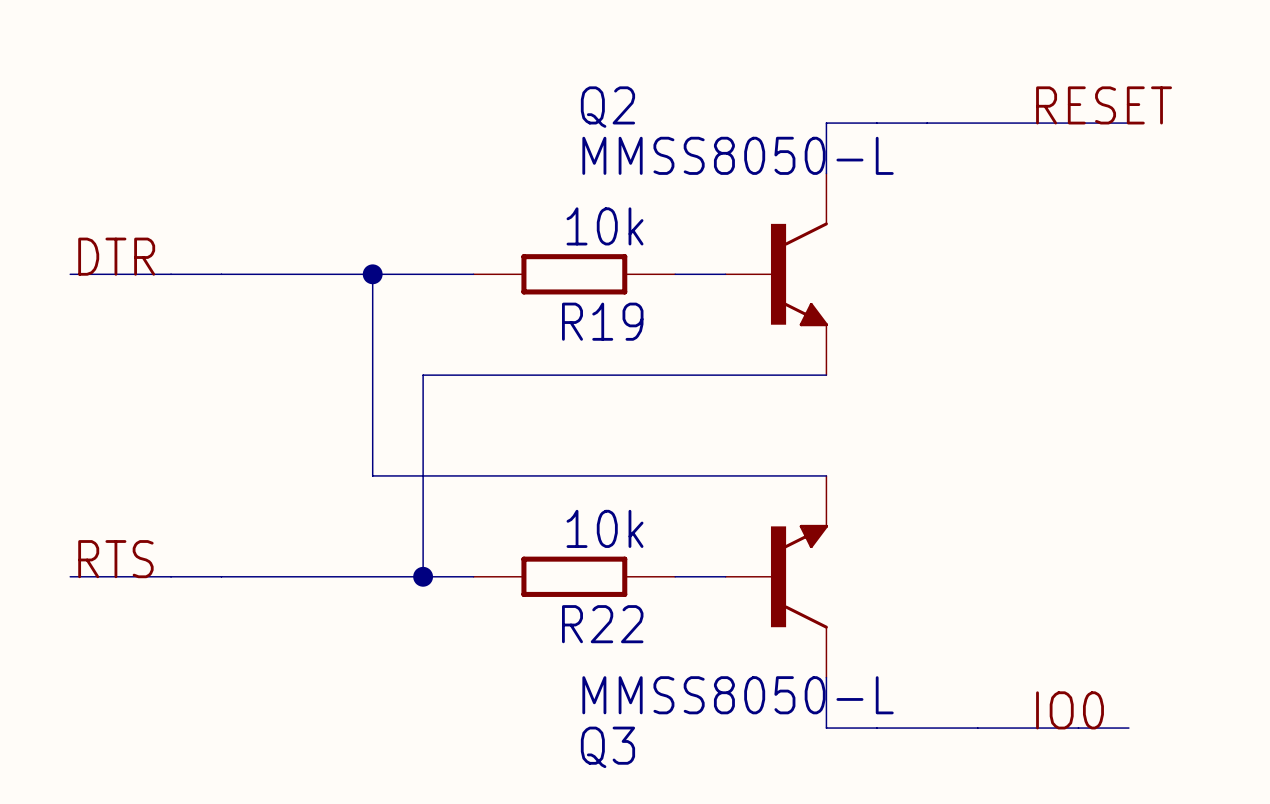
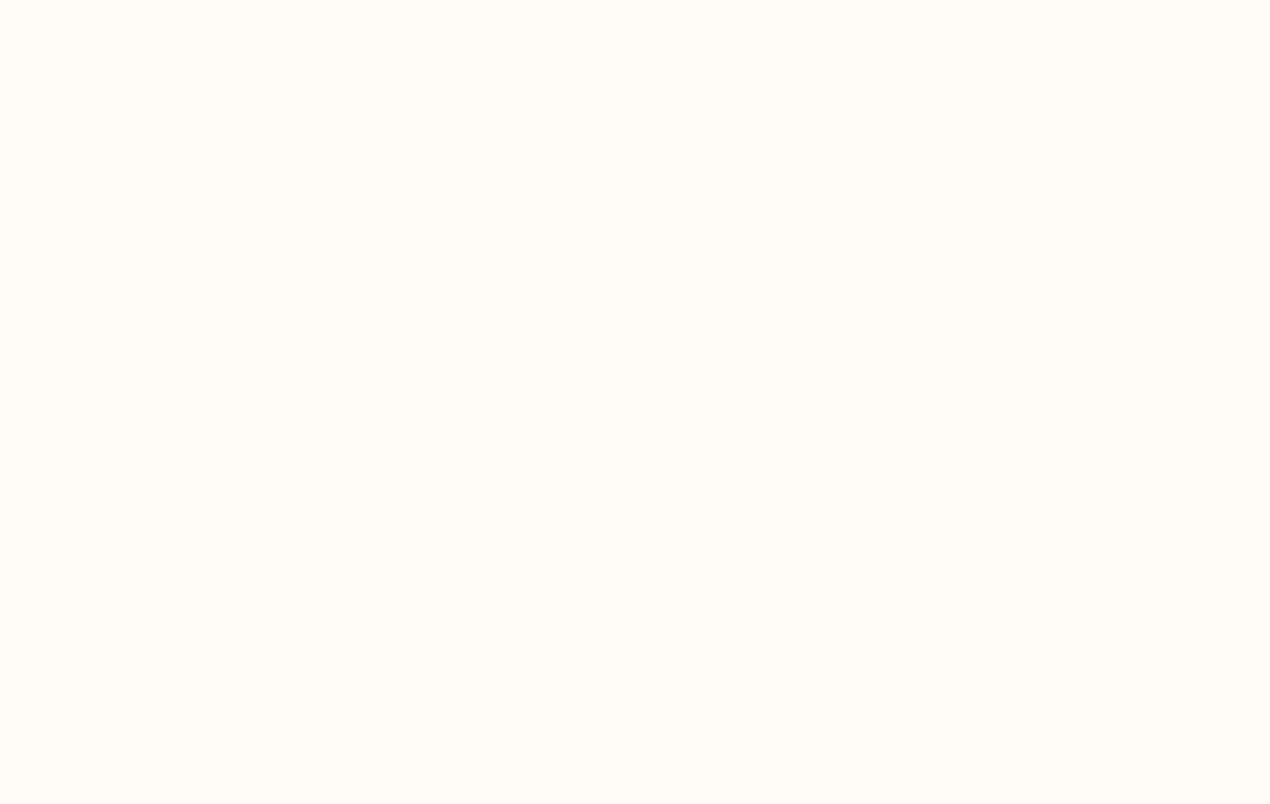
label: RESET (1104, 105) -> none
wire: (1128, 123) (826, 123) (826, 173) -> none
label: DTR (116, 256) -> none
wire: (70, 274) (473, 274) -> none
wire: (372, 274) (372, 475) (826, 475) -> none
junction: (372, 274) -> none
R19: 10k (574, 274) -> none
wire: (675, 274) (725, 274) -> none
Q2: MMSS8050-L (776, 274) -> none
wire: (826, 375) (423, 375) (423, 576) -> none
label: RTS (115, 559) -> none
wire: (70, 576) (473, 576) -> none
junction: (423, 576) -> none
R22: 10k (574, 576) -> none
wire: (675, 576) (725, 576) -> none
Q3: MMSS8050-L (776, 576) -> none
wire: (826, 677) (826, 728) (1128, 728) -> none
label: IO0 (1070, 710) -> none

